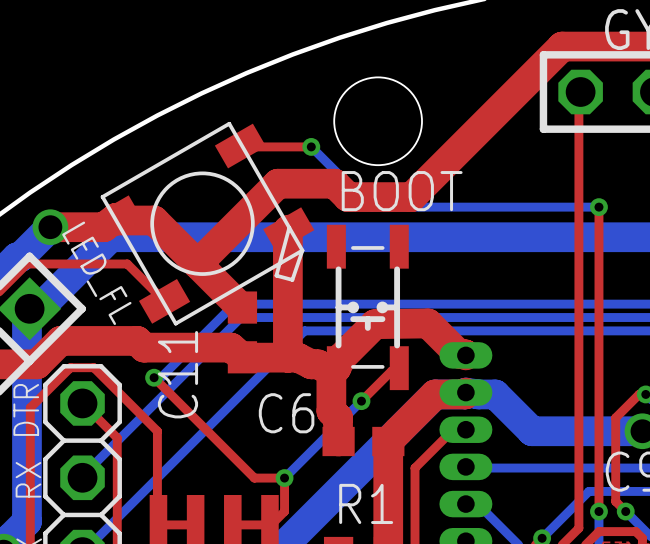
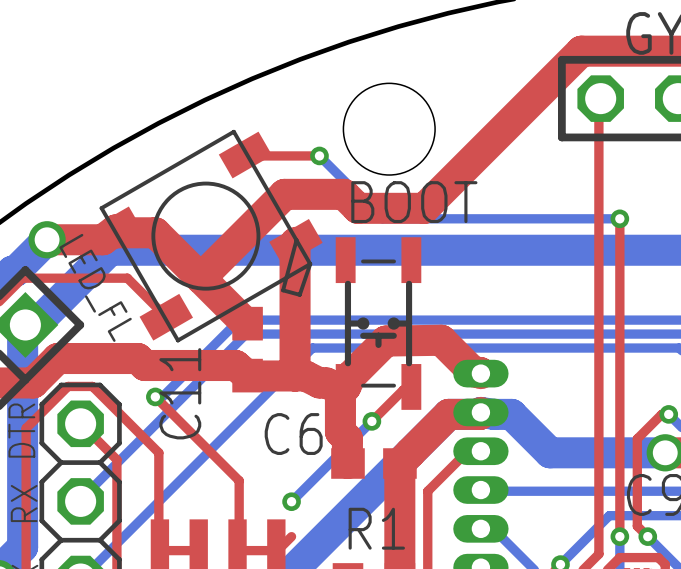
top track: (234, 458) (254, 478) (284, 478) (284, 511) -> (239, 480) (239, 547) (237, 552)

